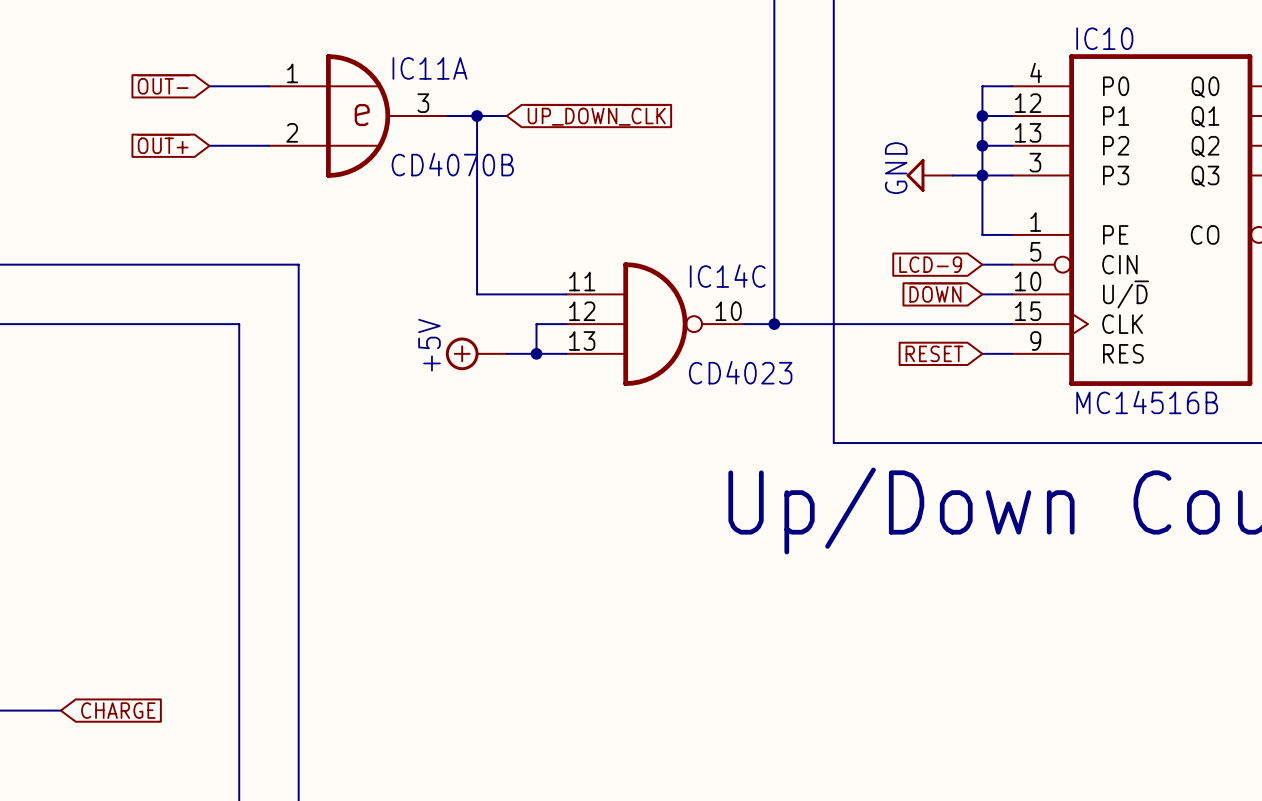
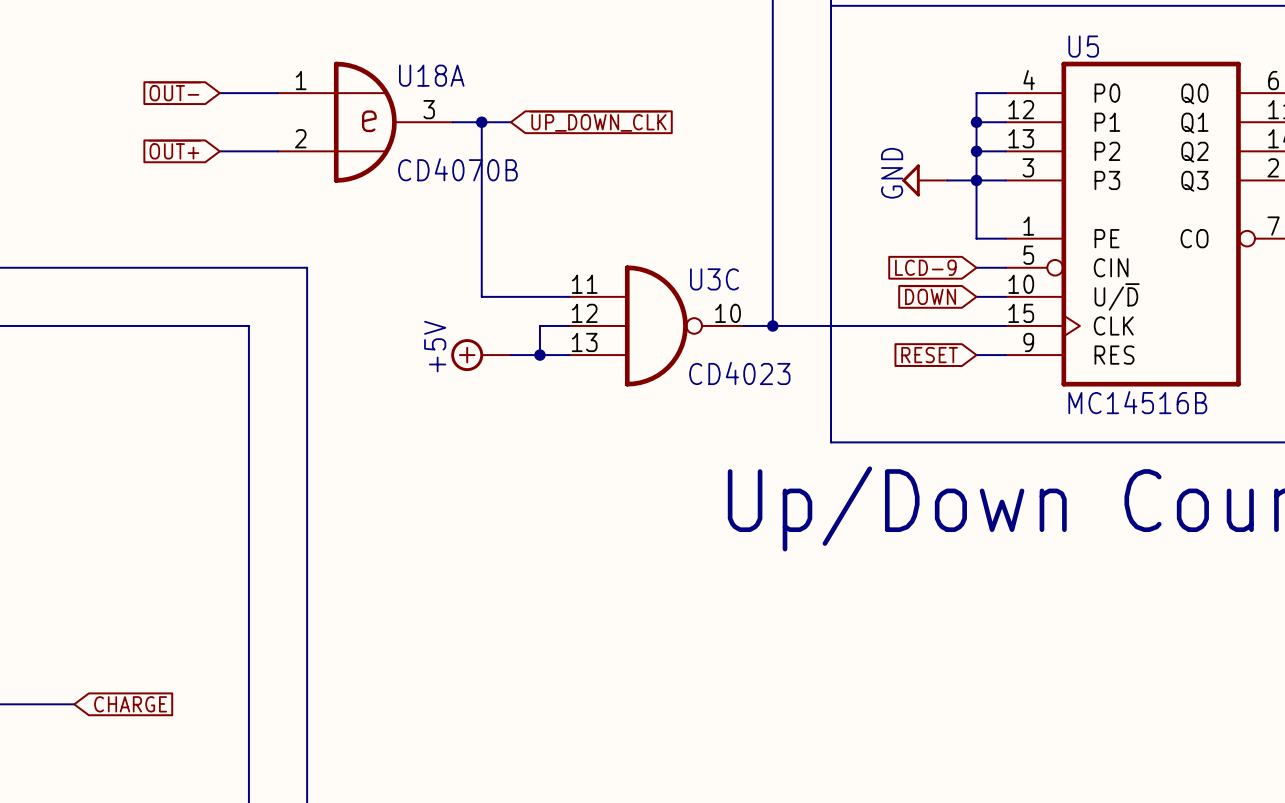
IC10 name: IC10 (1104, 38) -> U5 (1083, 46)
IC11A name: IC11A (429, 68) -> U18A (431, 75)
IC14C name: IC14C (727, 276) -> U3C (714, 279)

